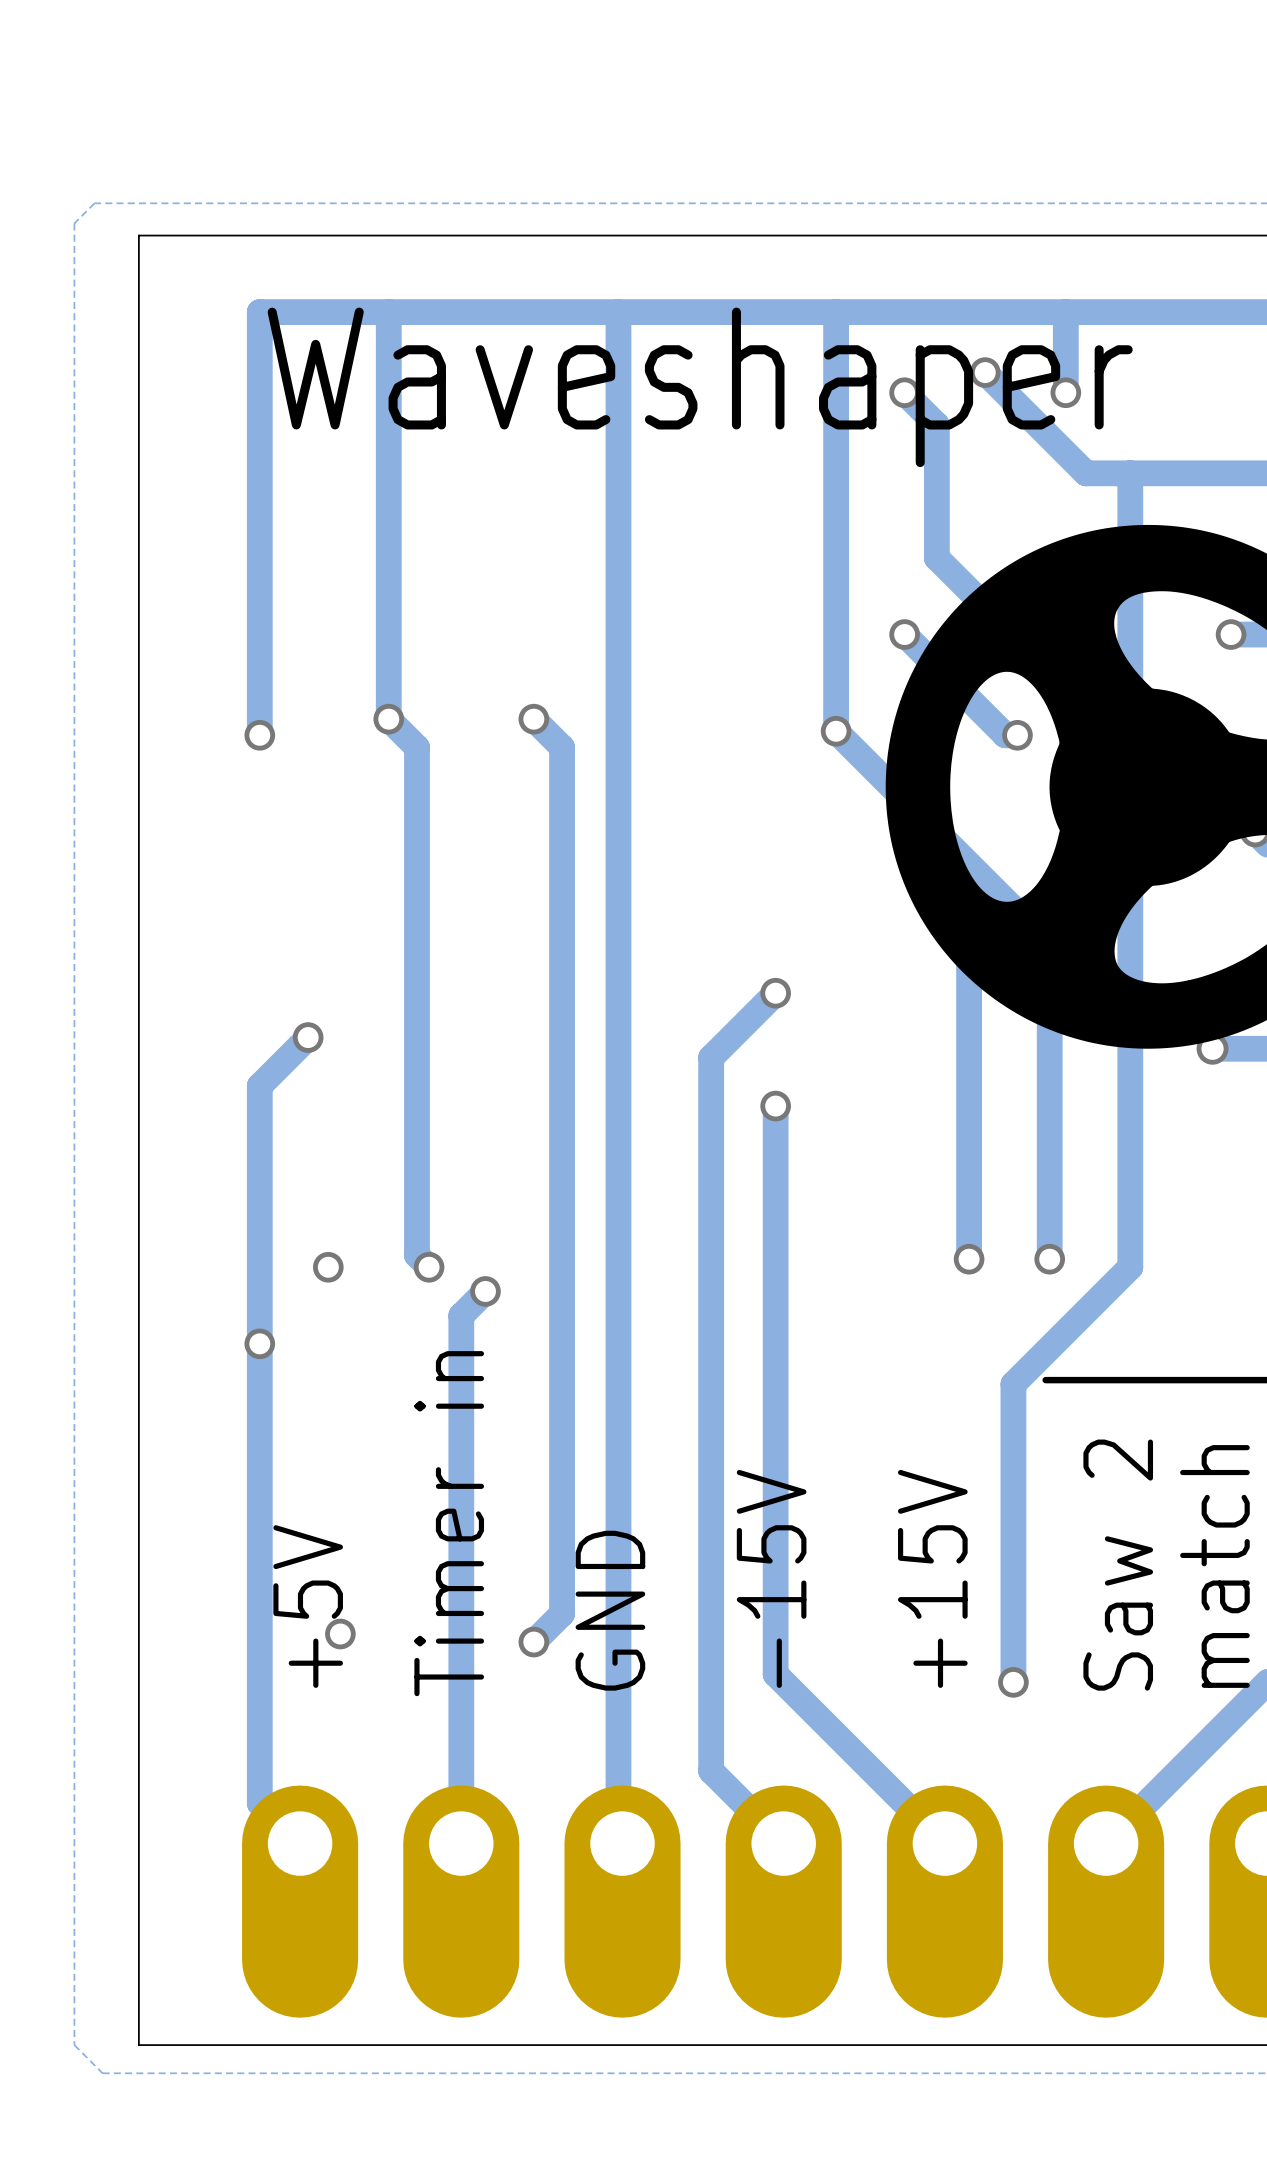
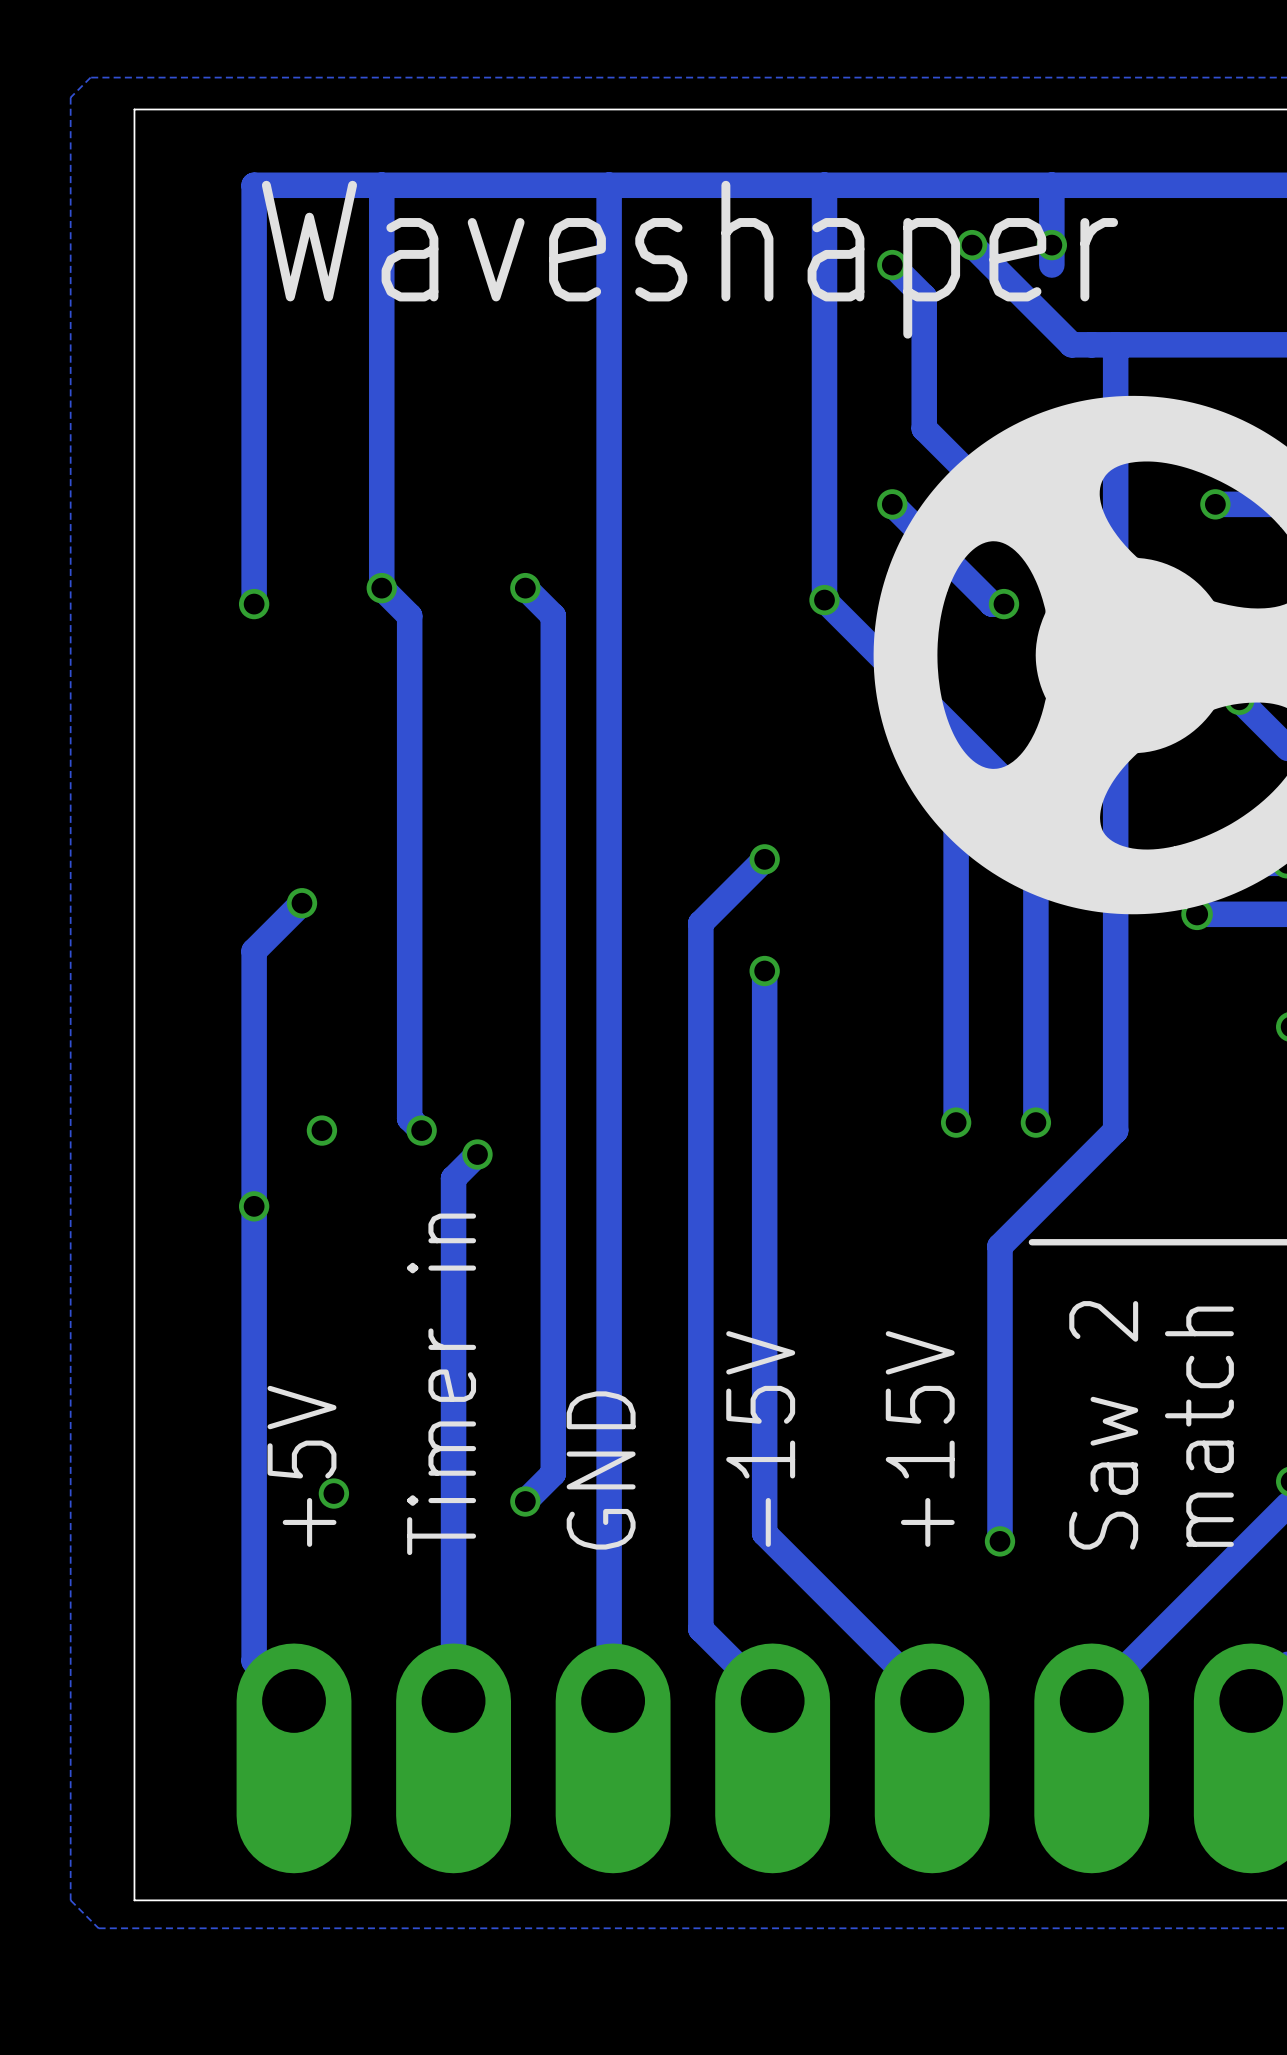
via position: (1065, 392) -> (1051, 245)

